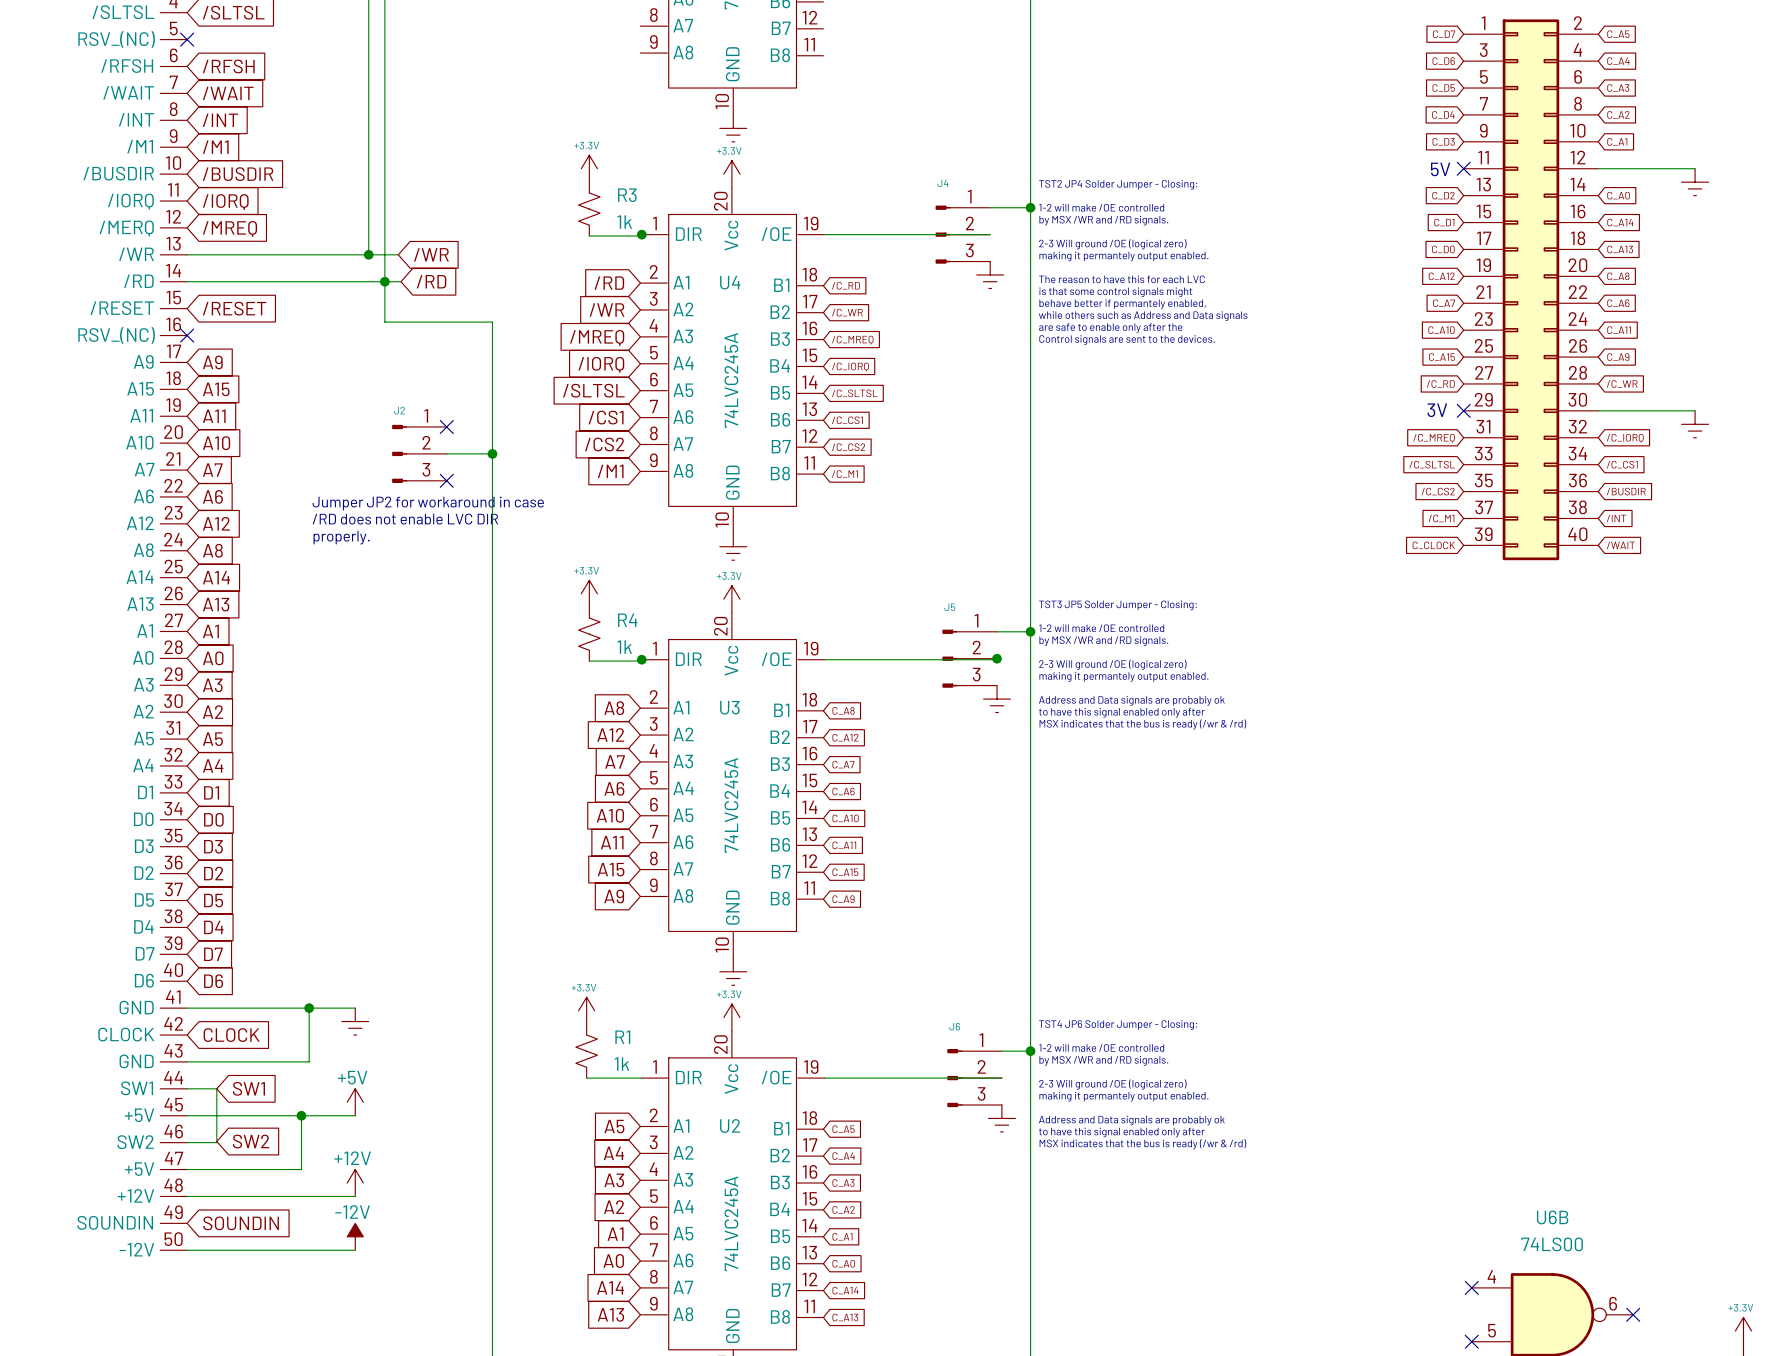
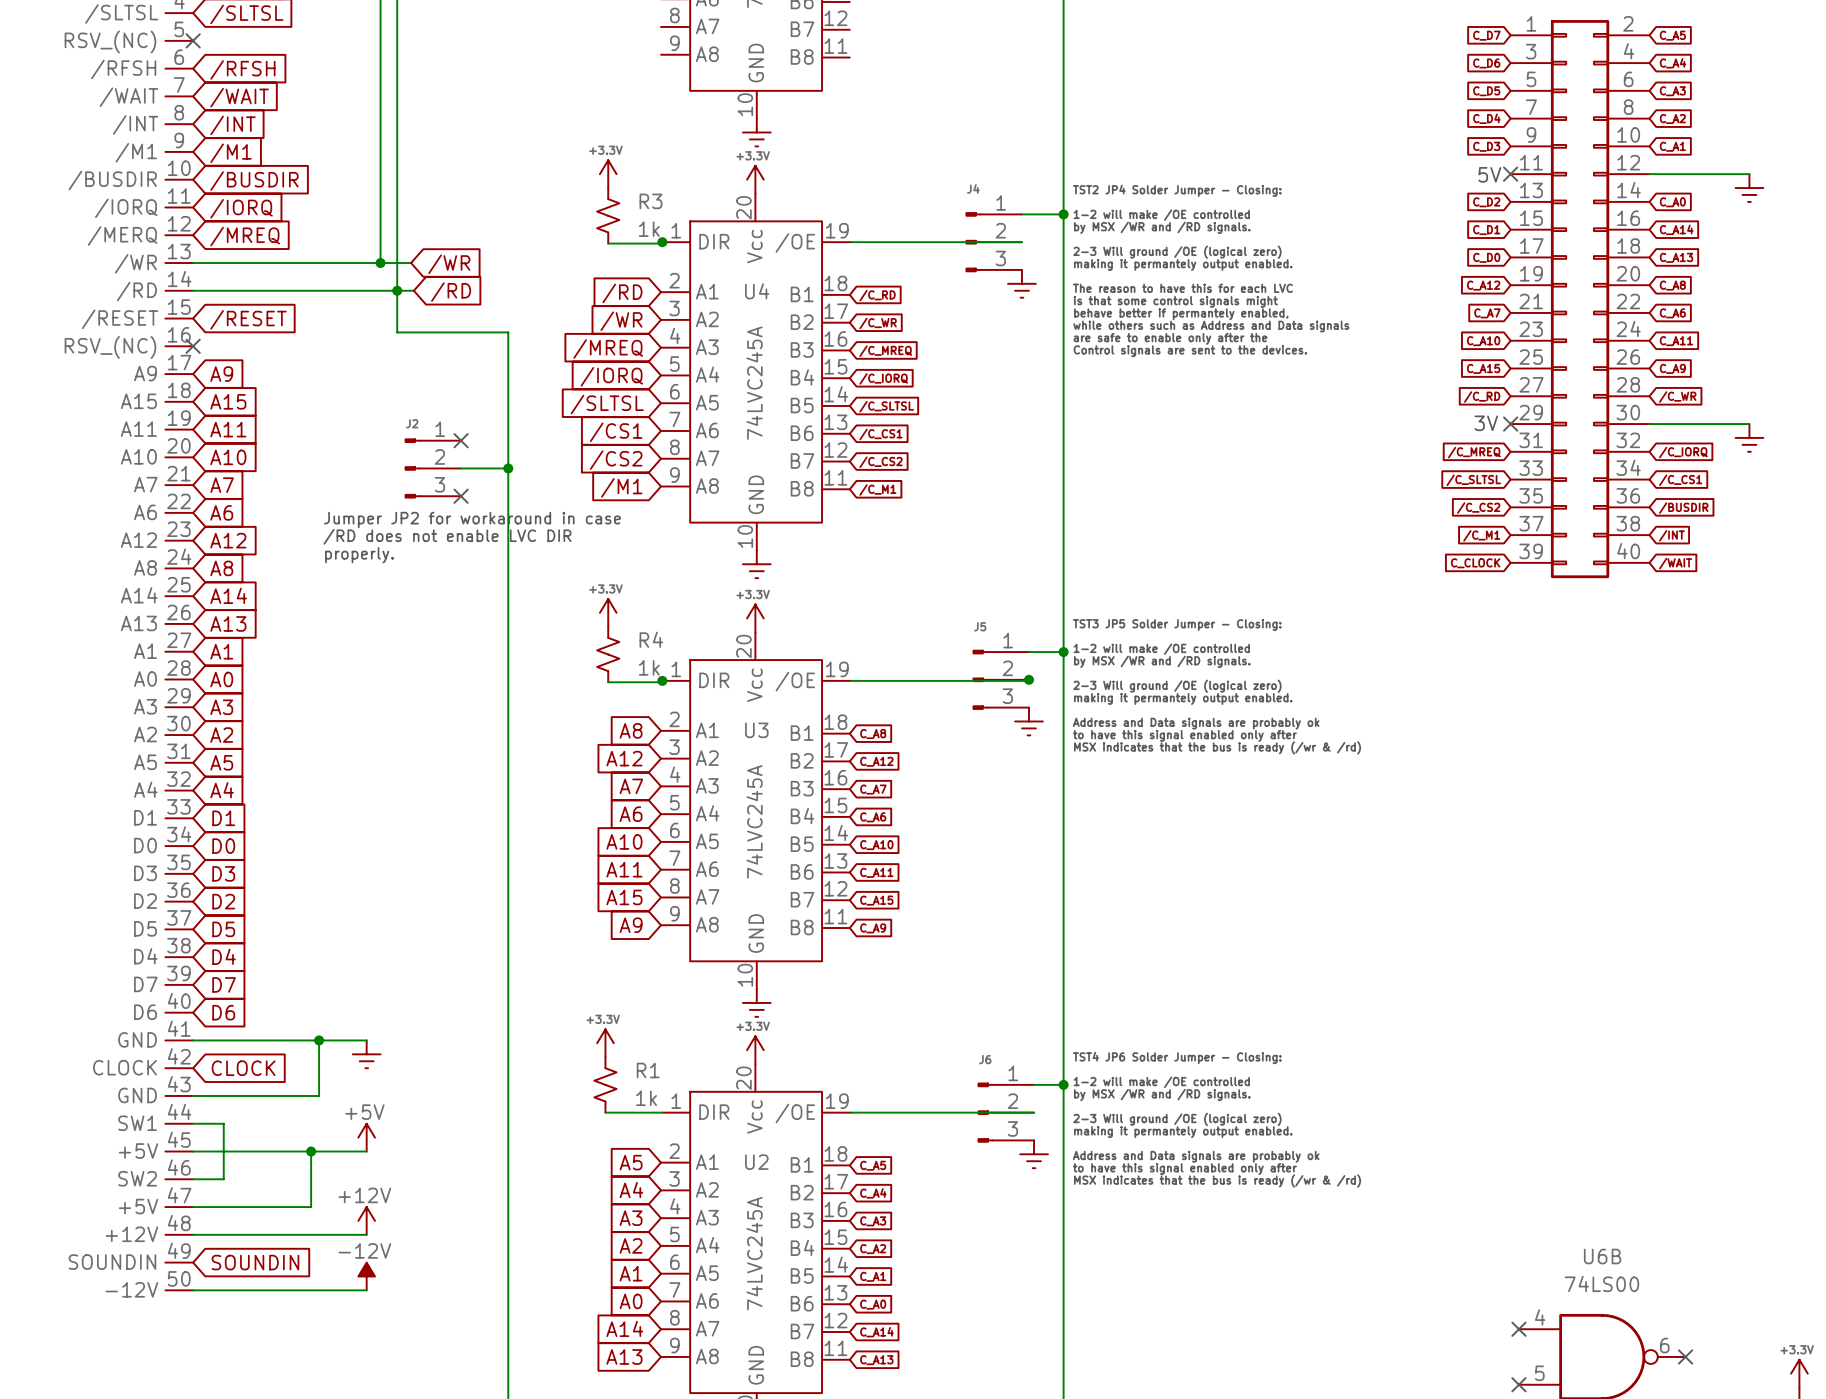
global label: SW1 (248, 1088) -> none
global label: SW2 (251, 1141) -> none

